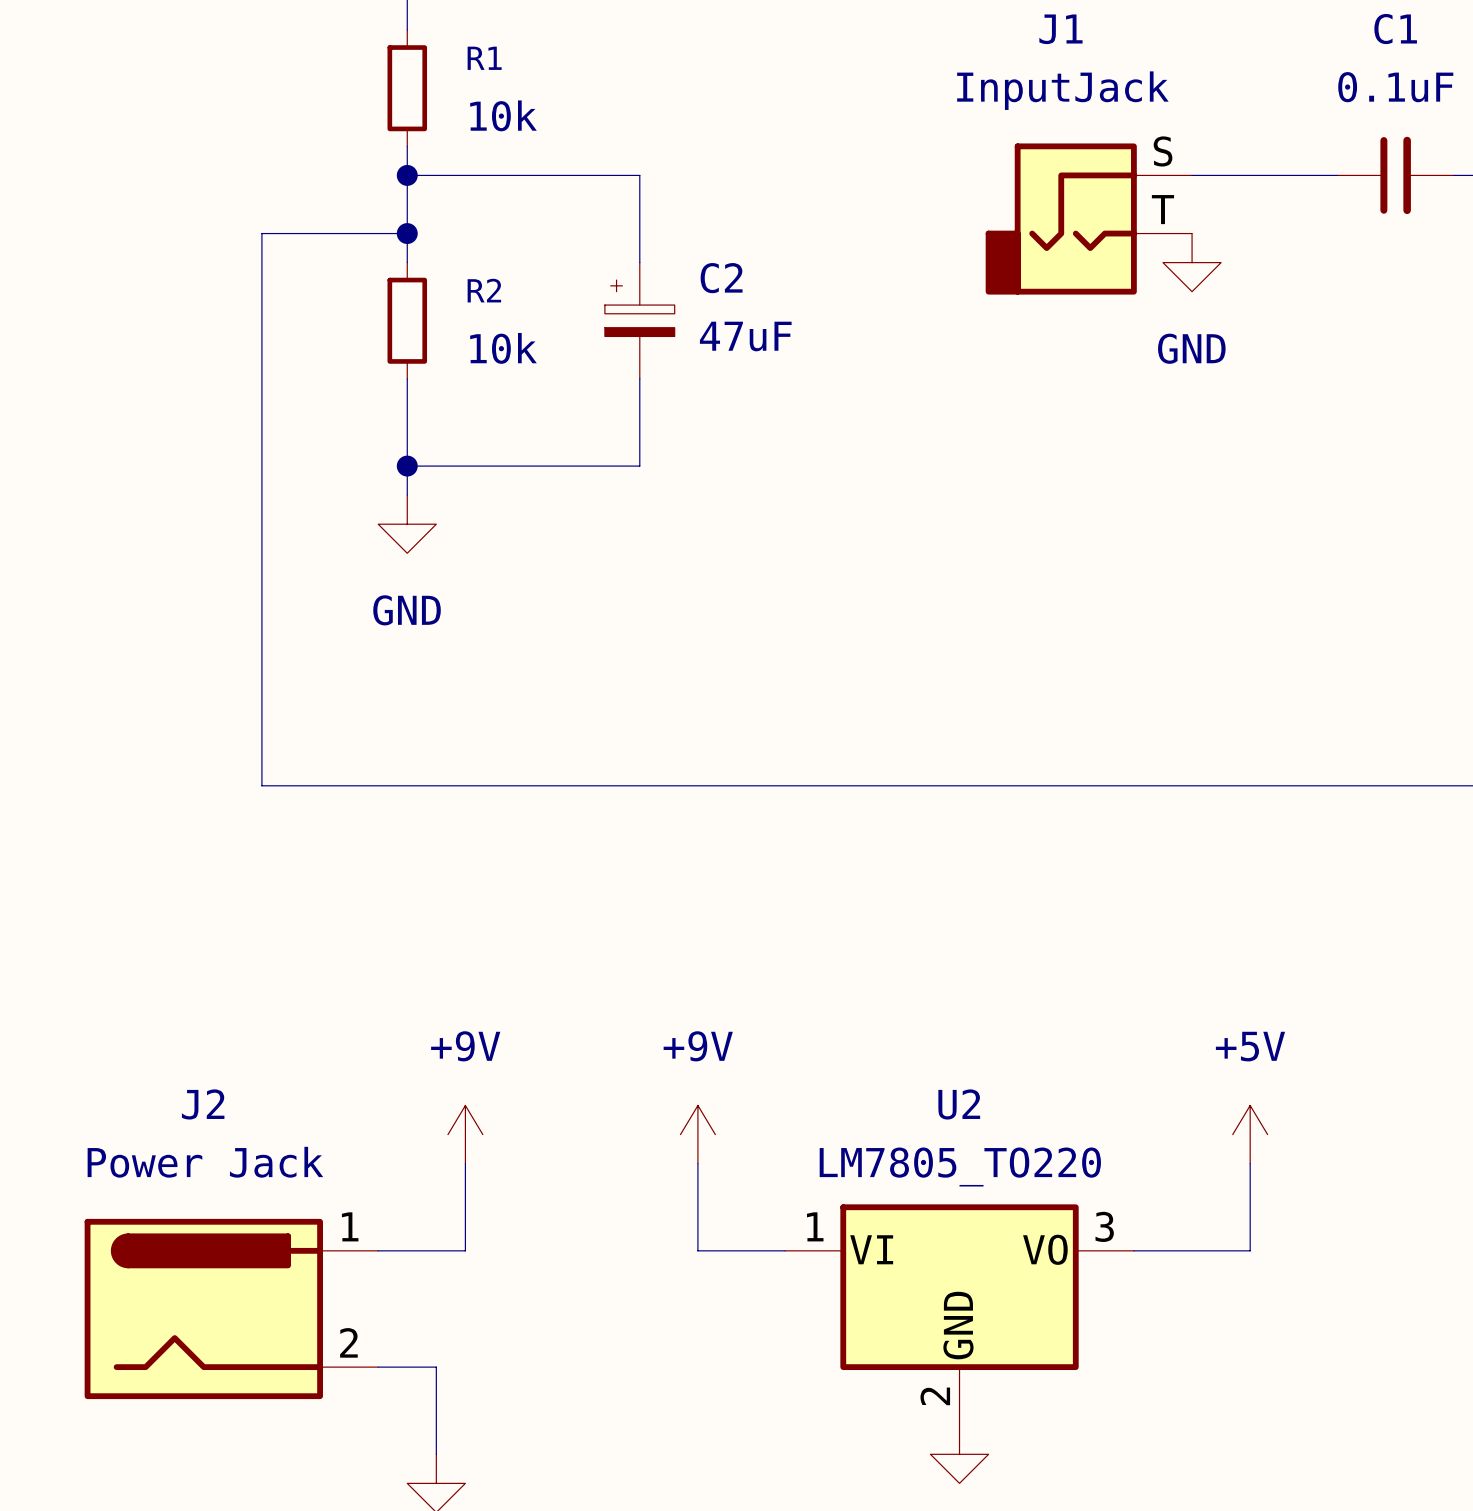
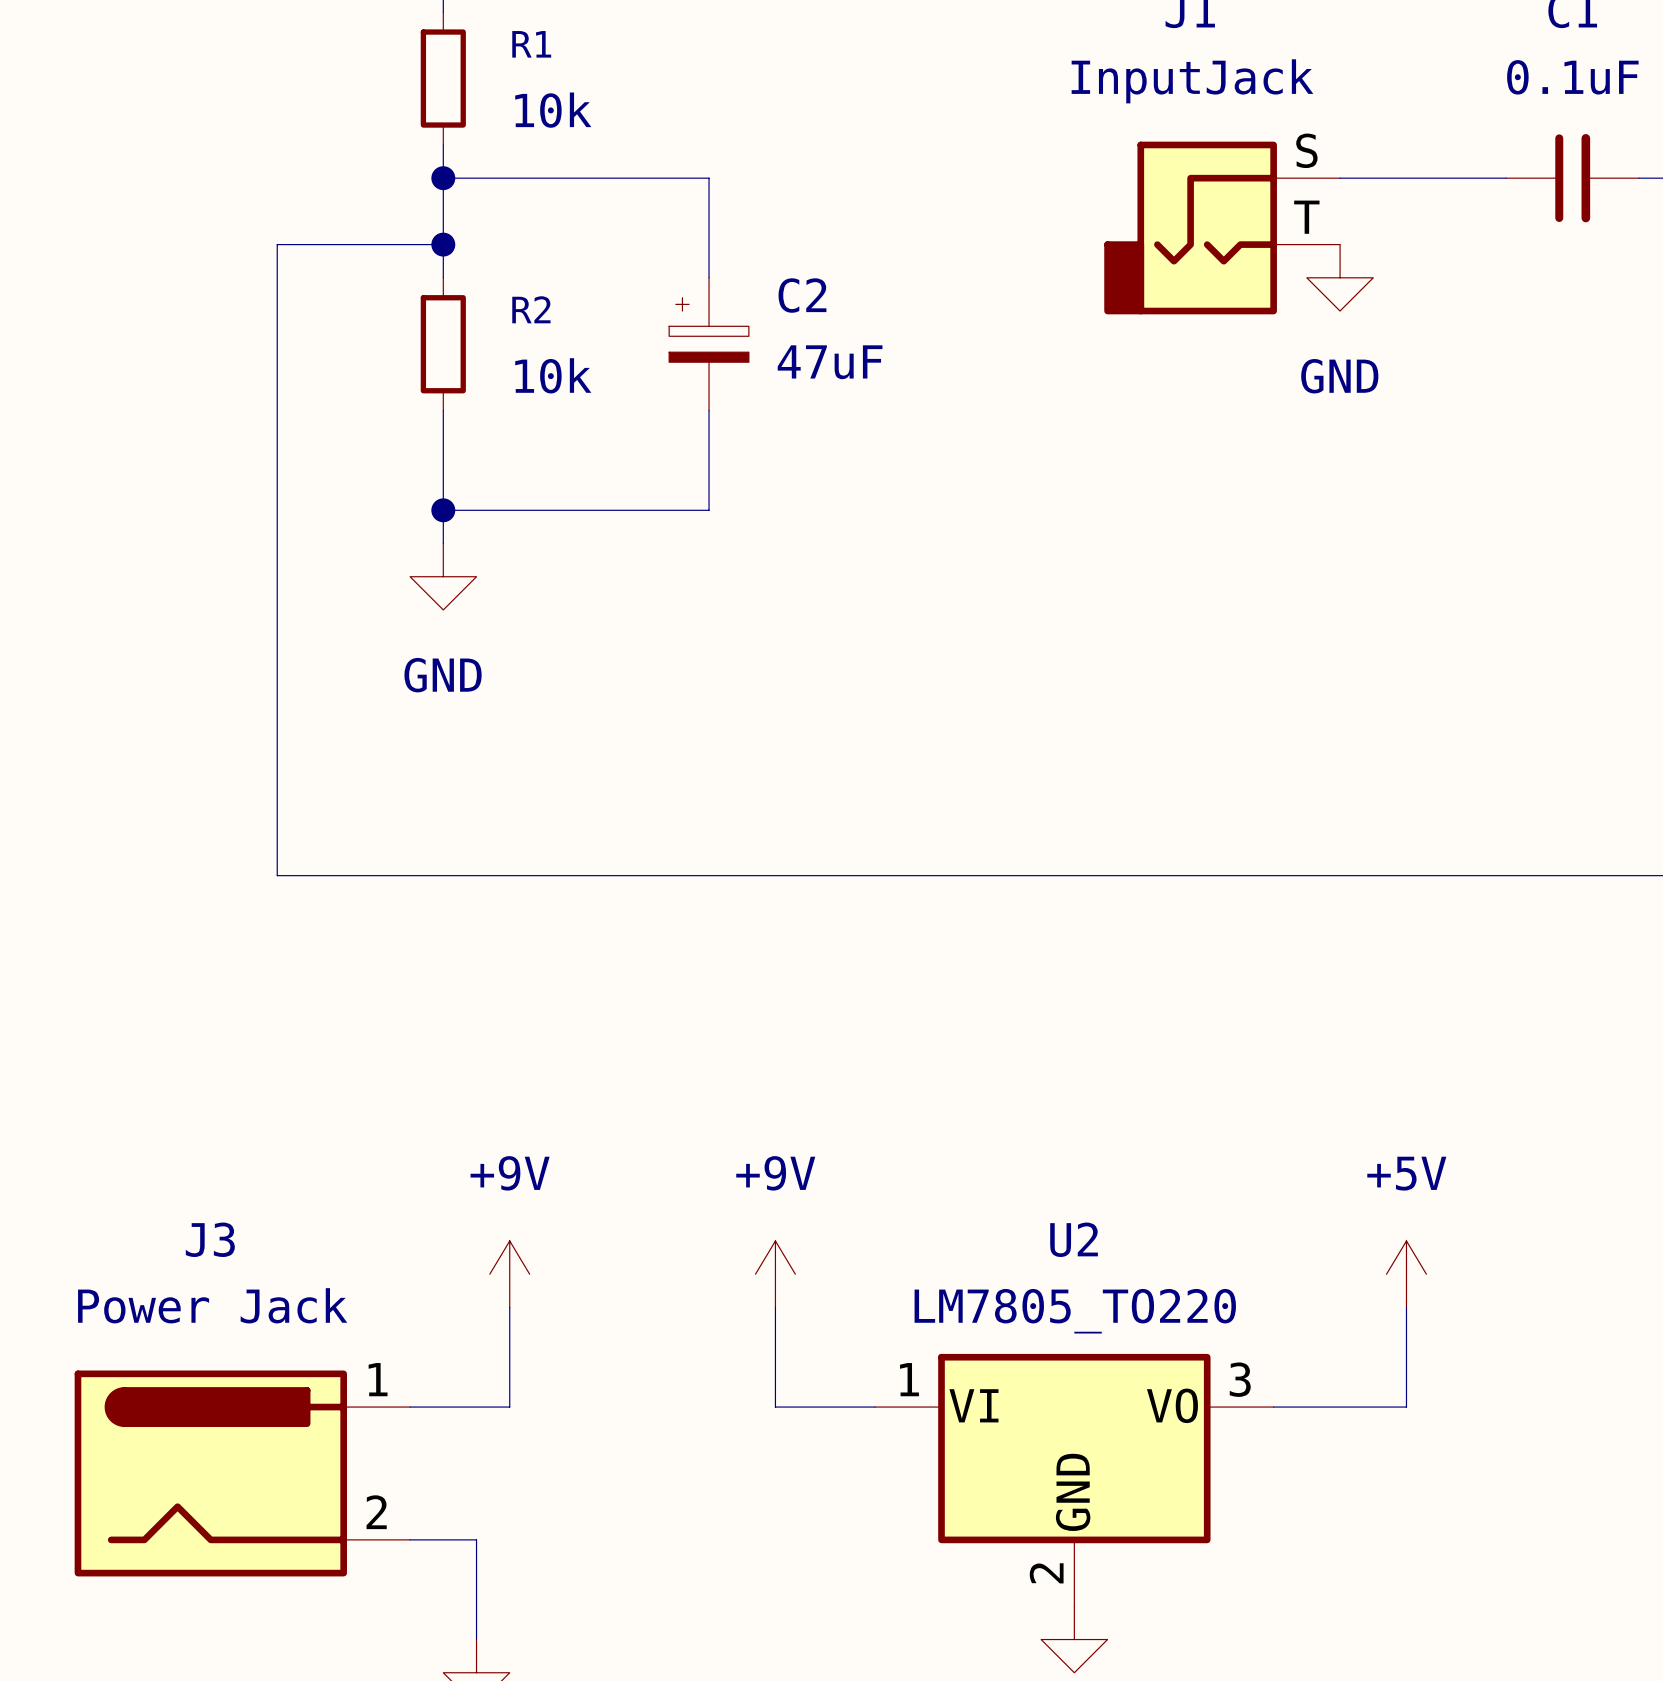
J2 name: J2 (203, 1104) -> J3 (210, 1239)

